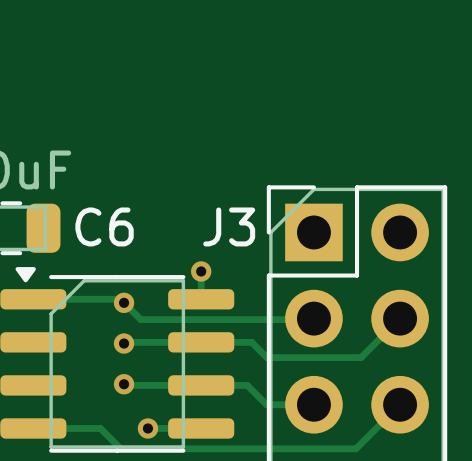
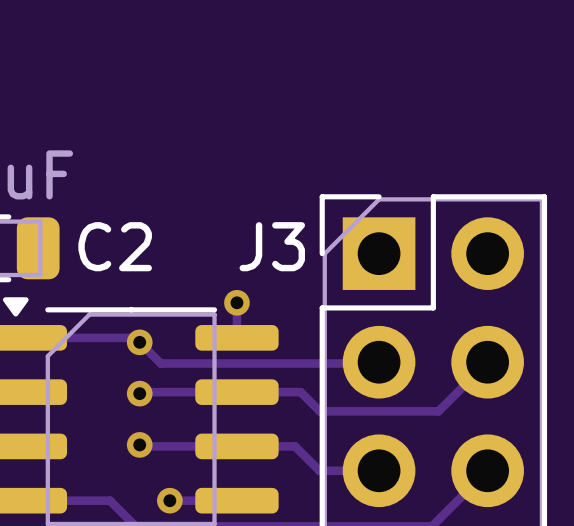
C6 name: C6 (104, 226) -> C2 (115, 246)

